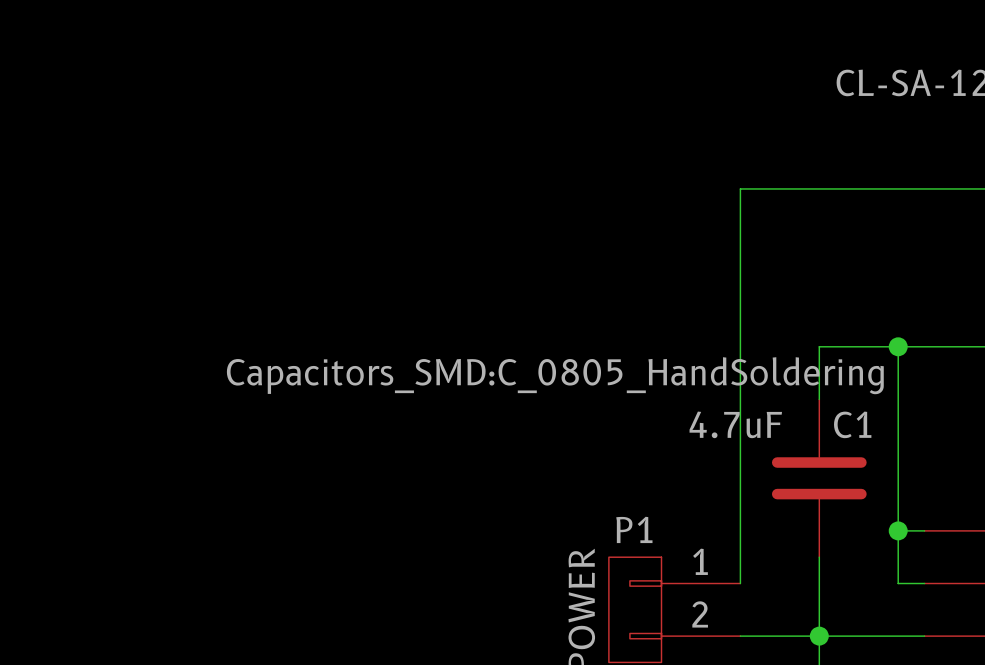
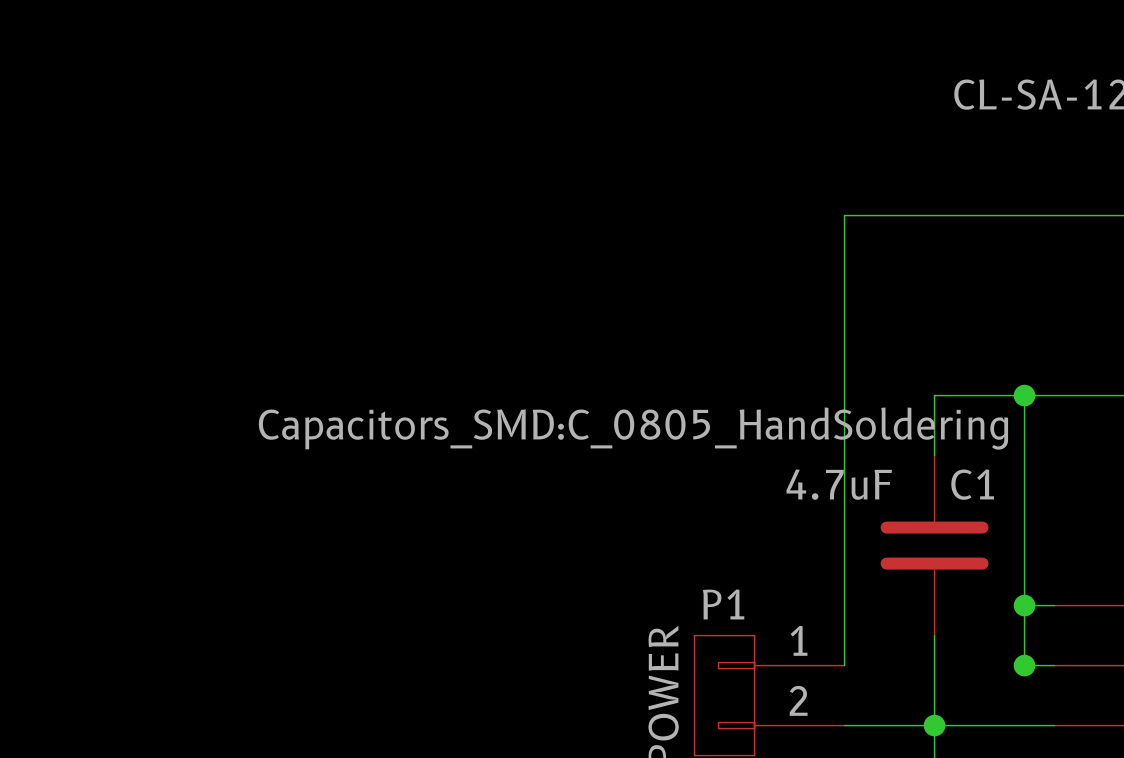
junction: none -> (1024, 665)

